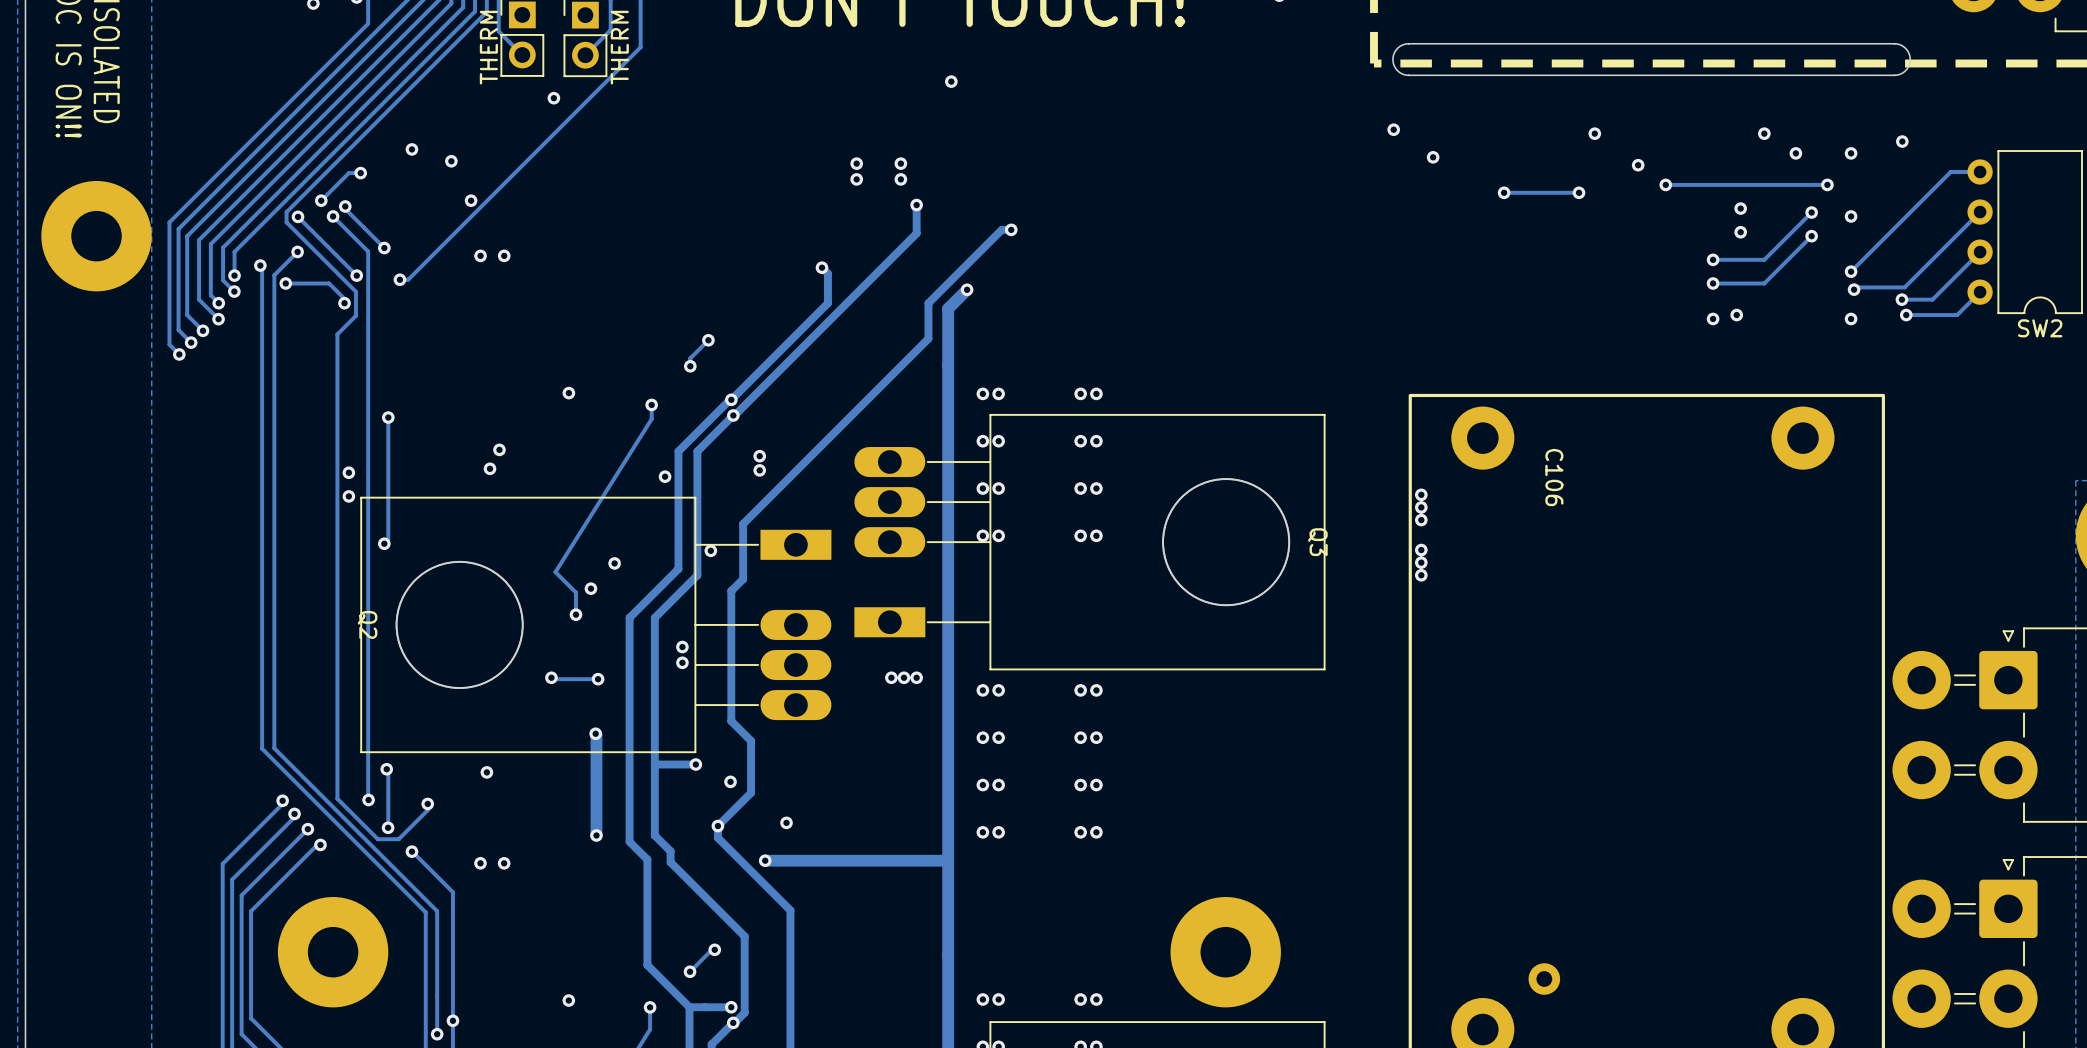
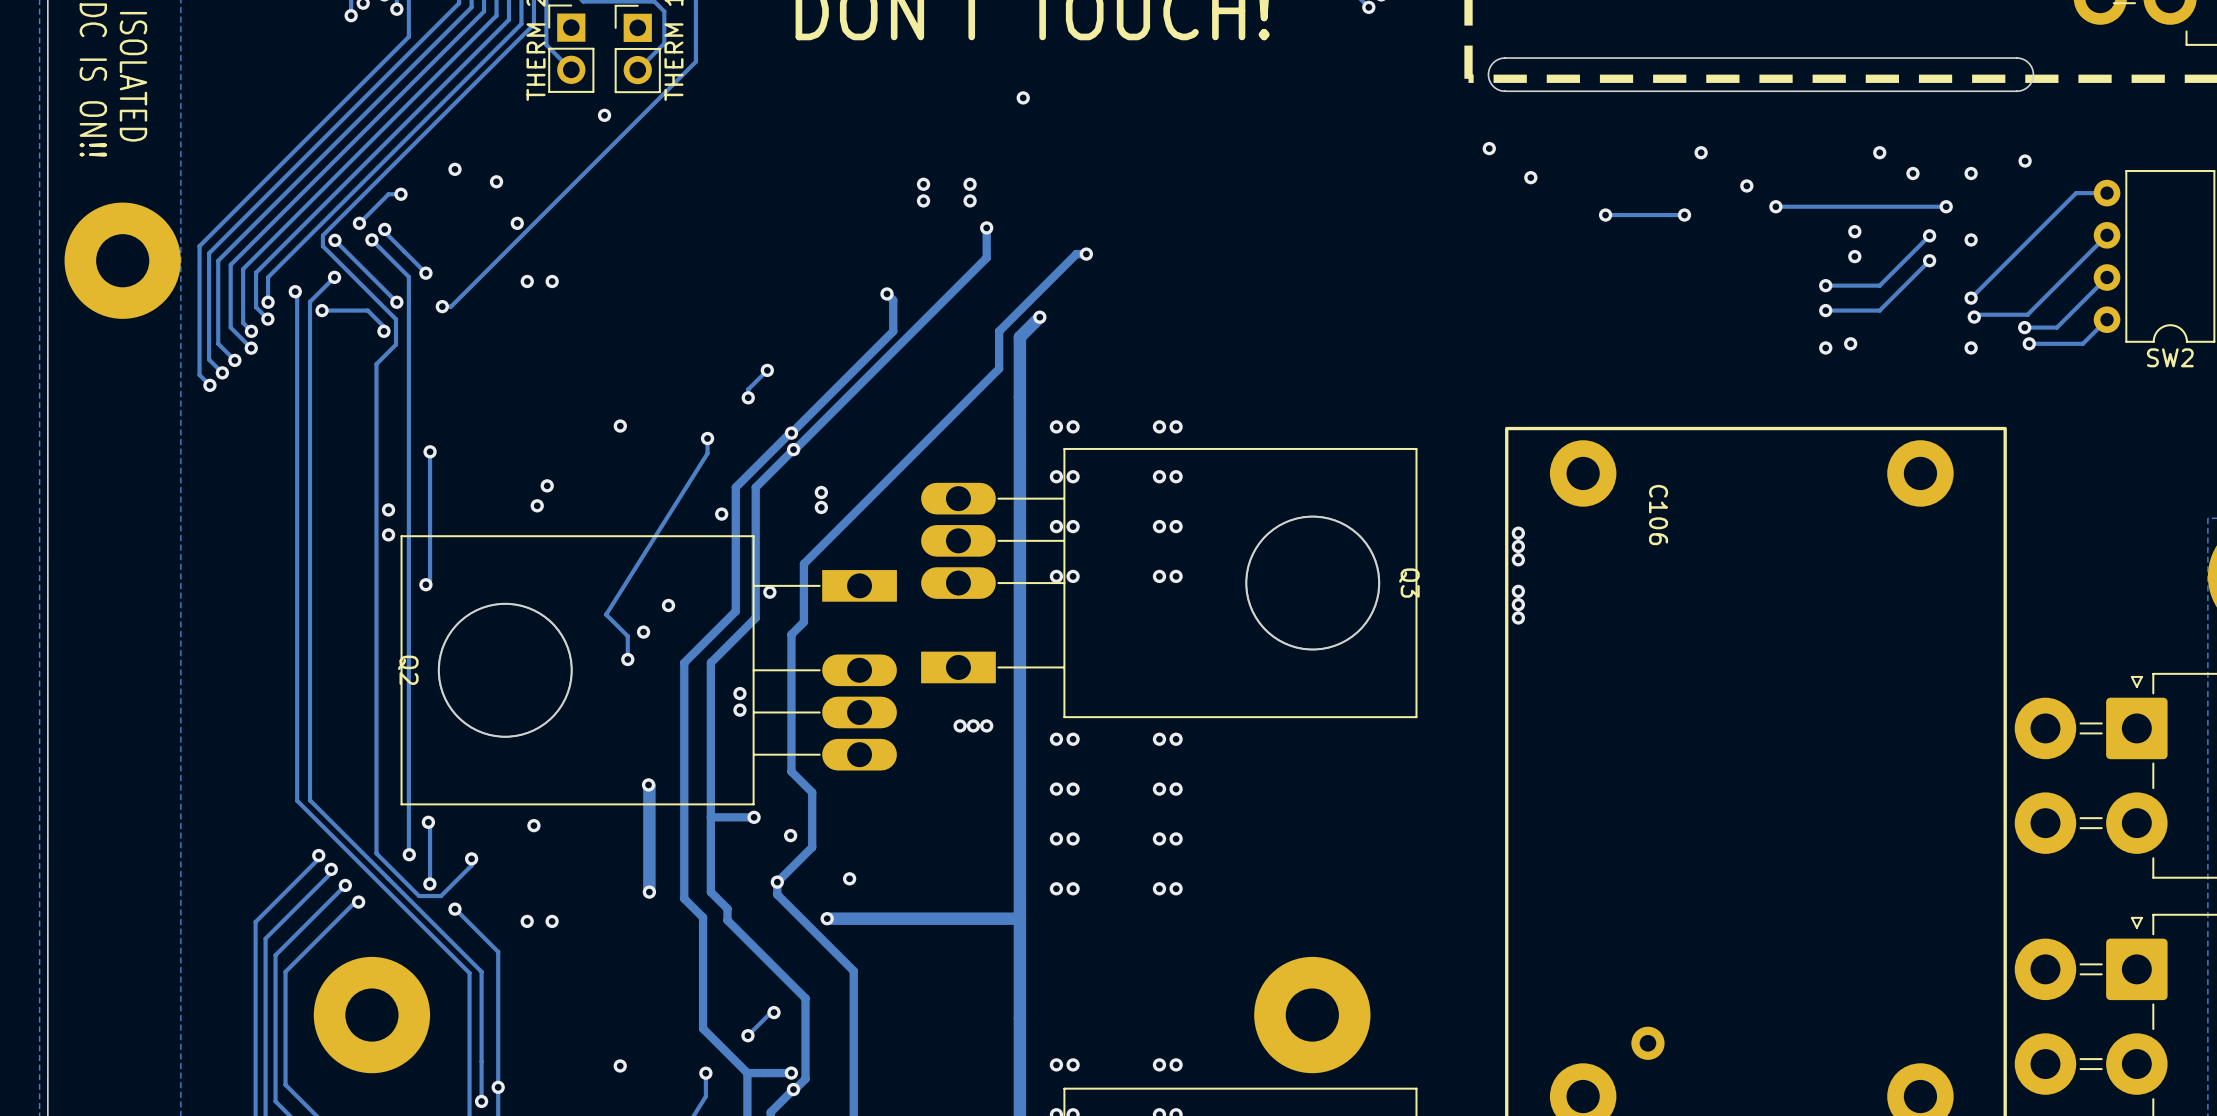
track: (551, 677) (598, 679) -> none
via: (551, 677) -> none
via: (598, 679) -> none

